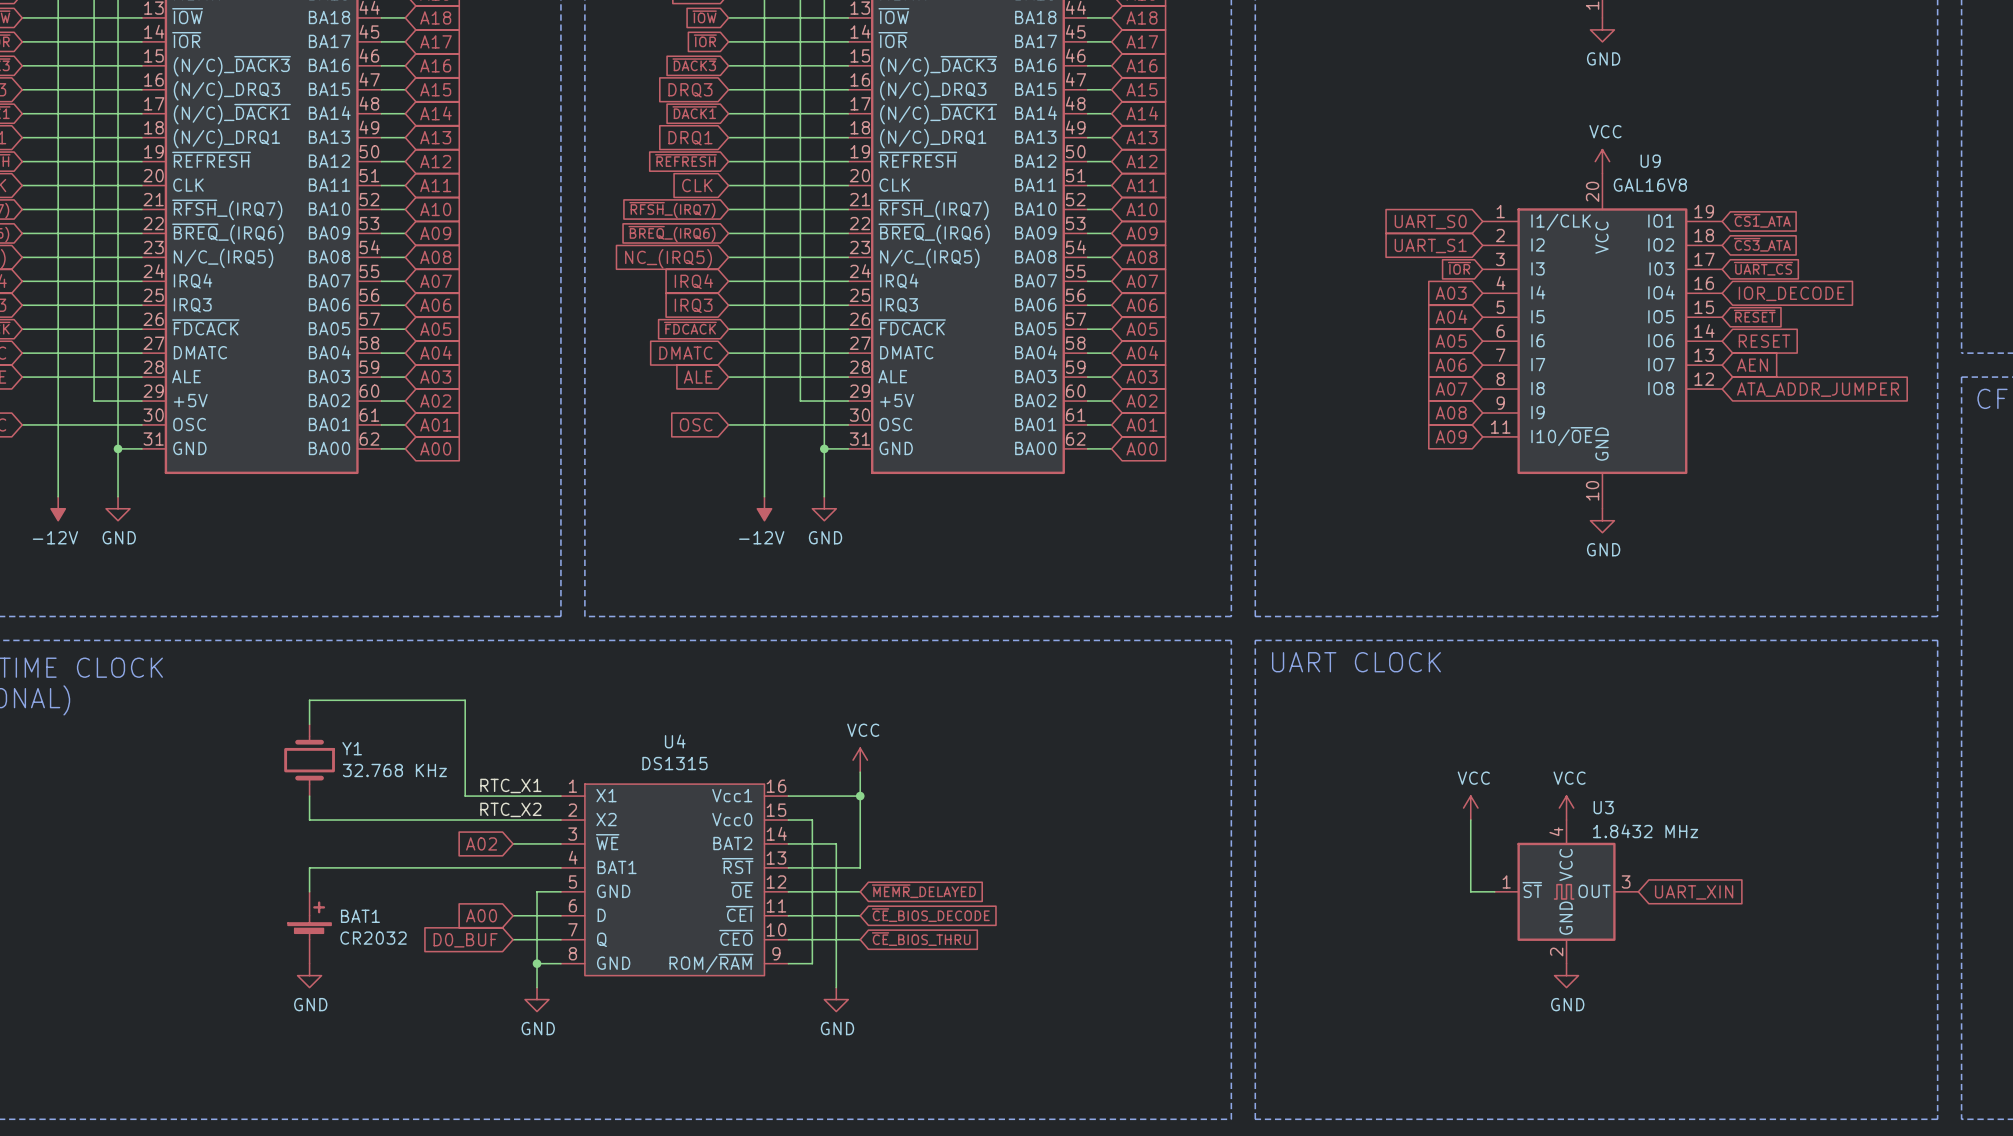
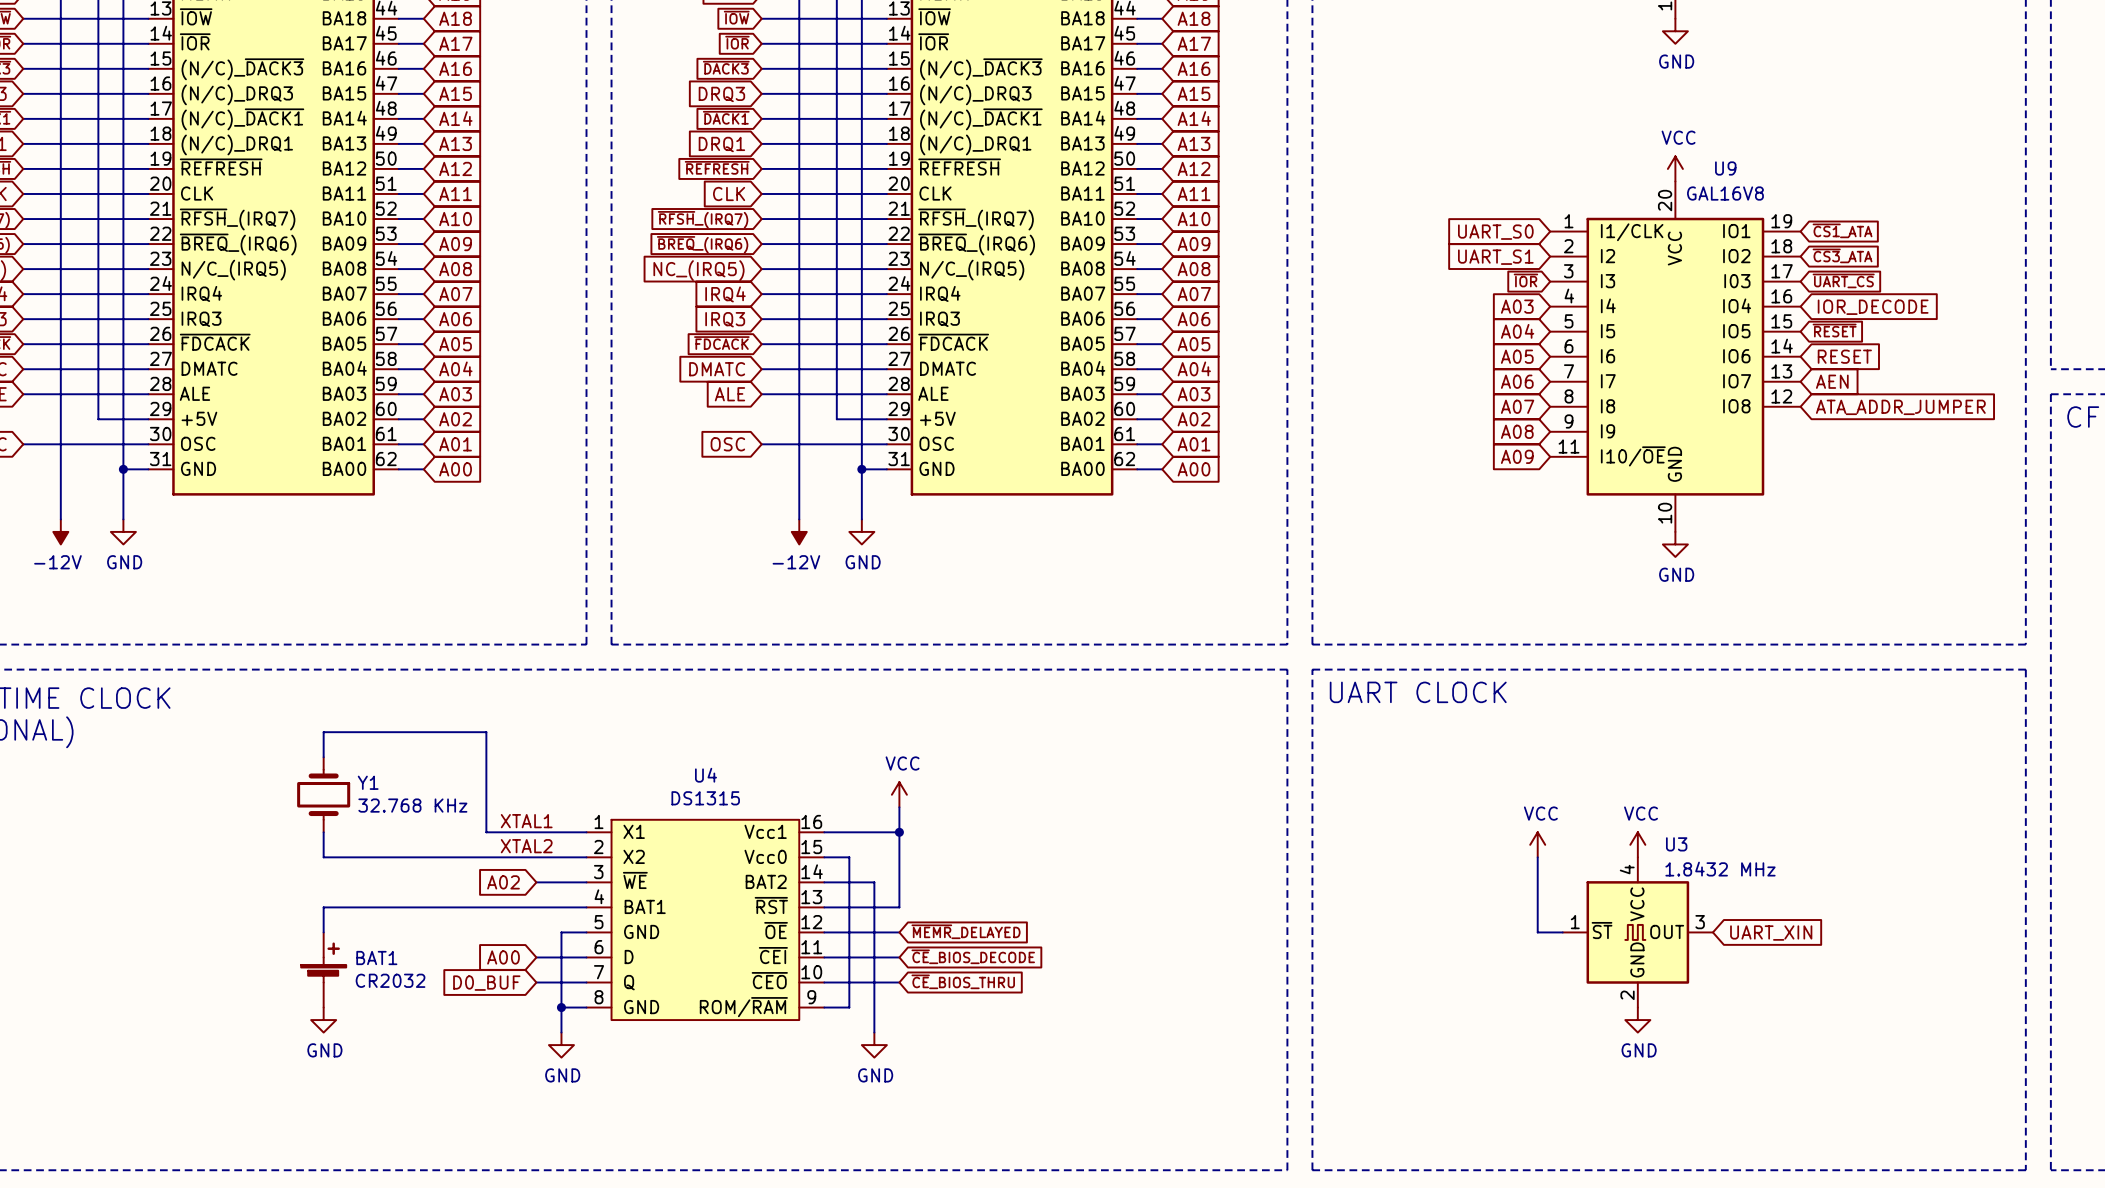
label: RTC_X1 (510, 785) -> XTAL1 (526, 821)
label: RTC_X2 (510, 809) -> XTAL2 (526, 846)

